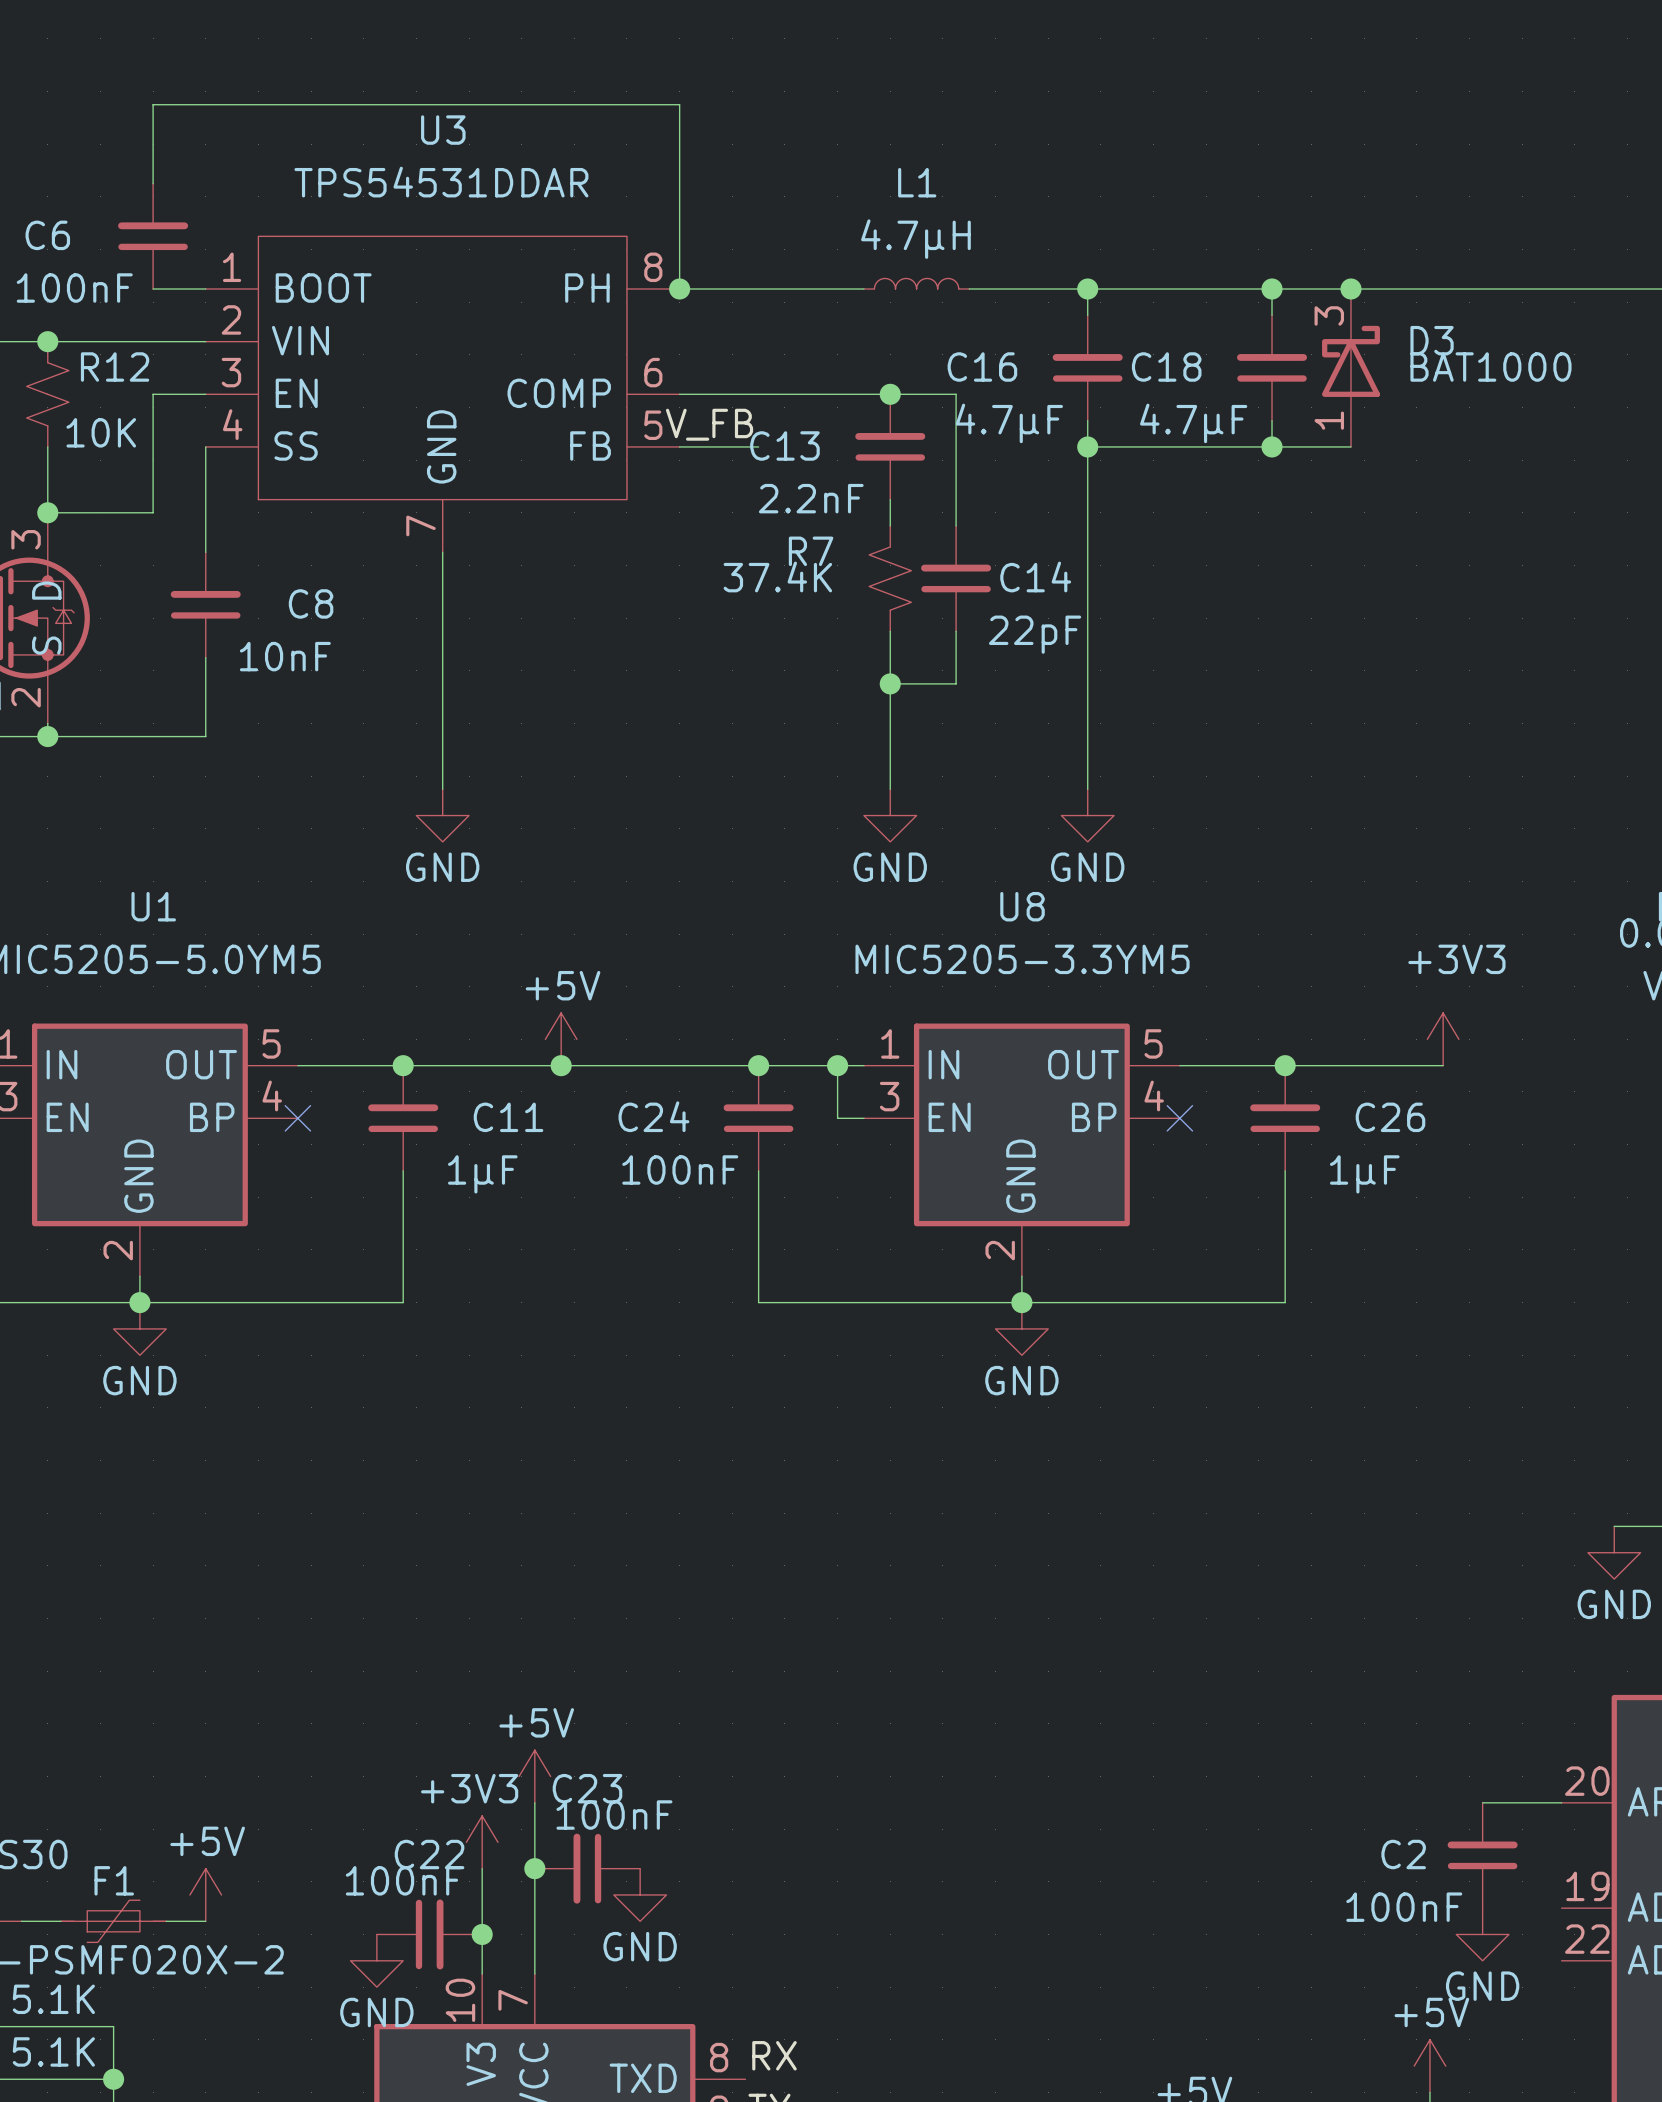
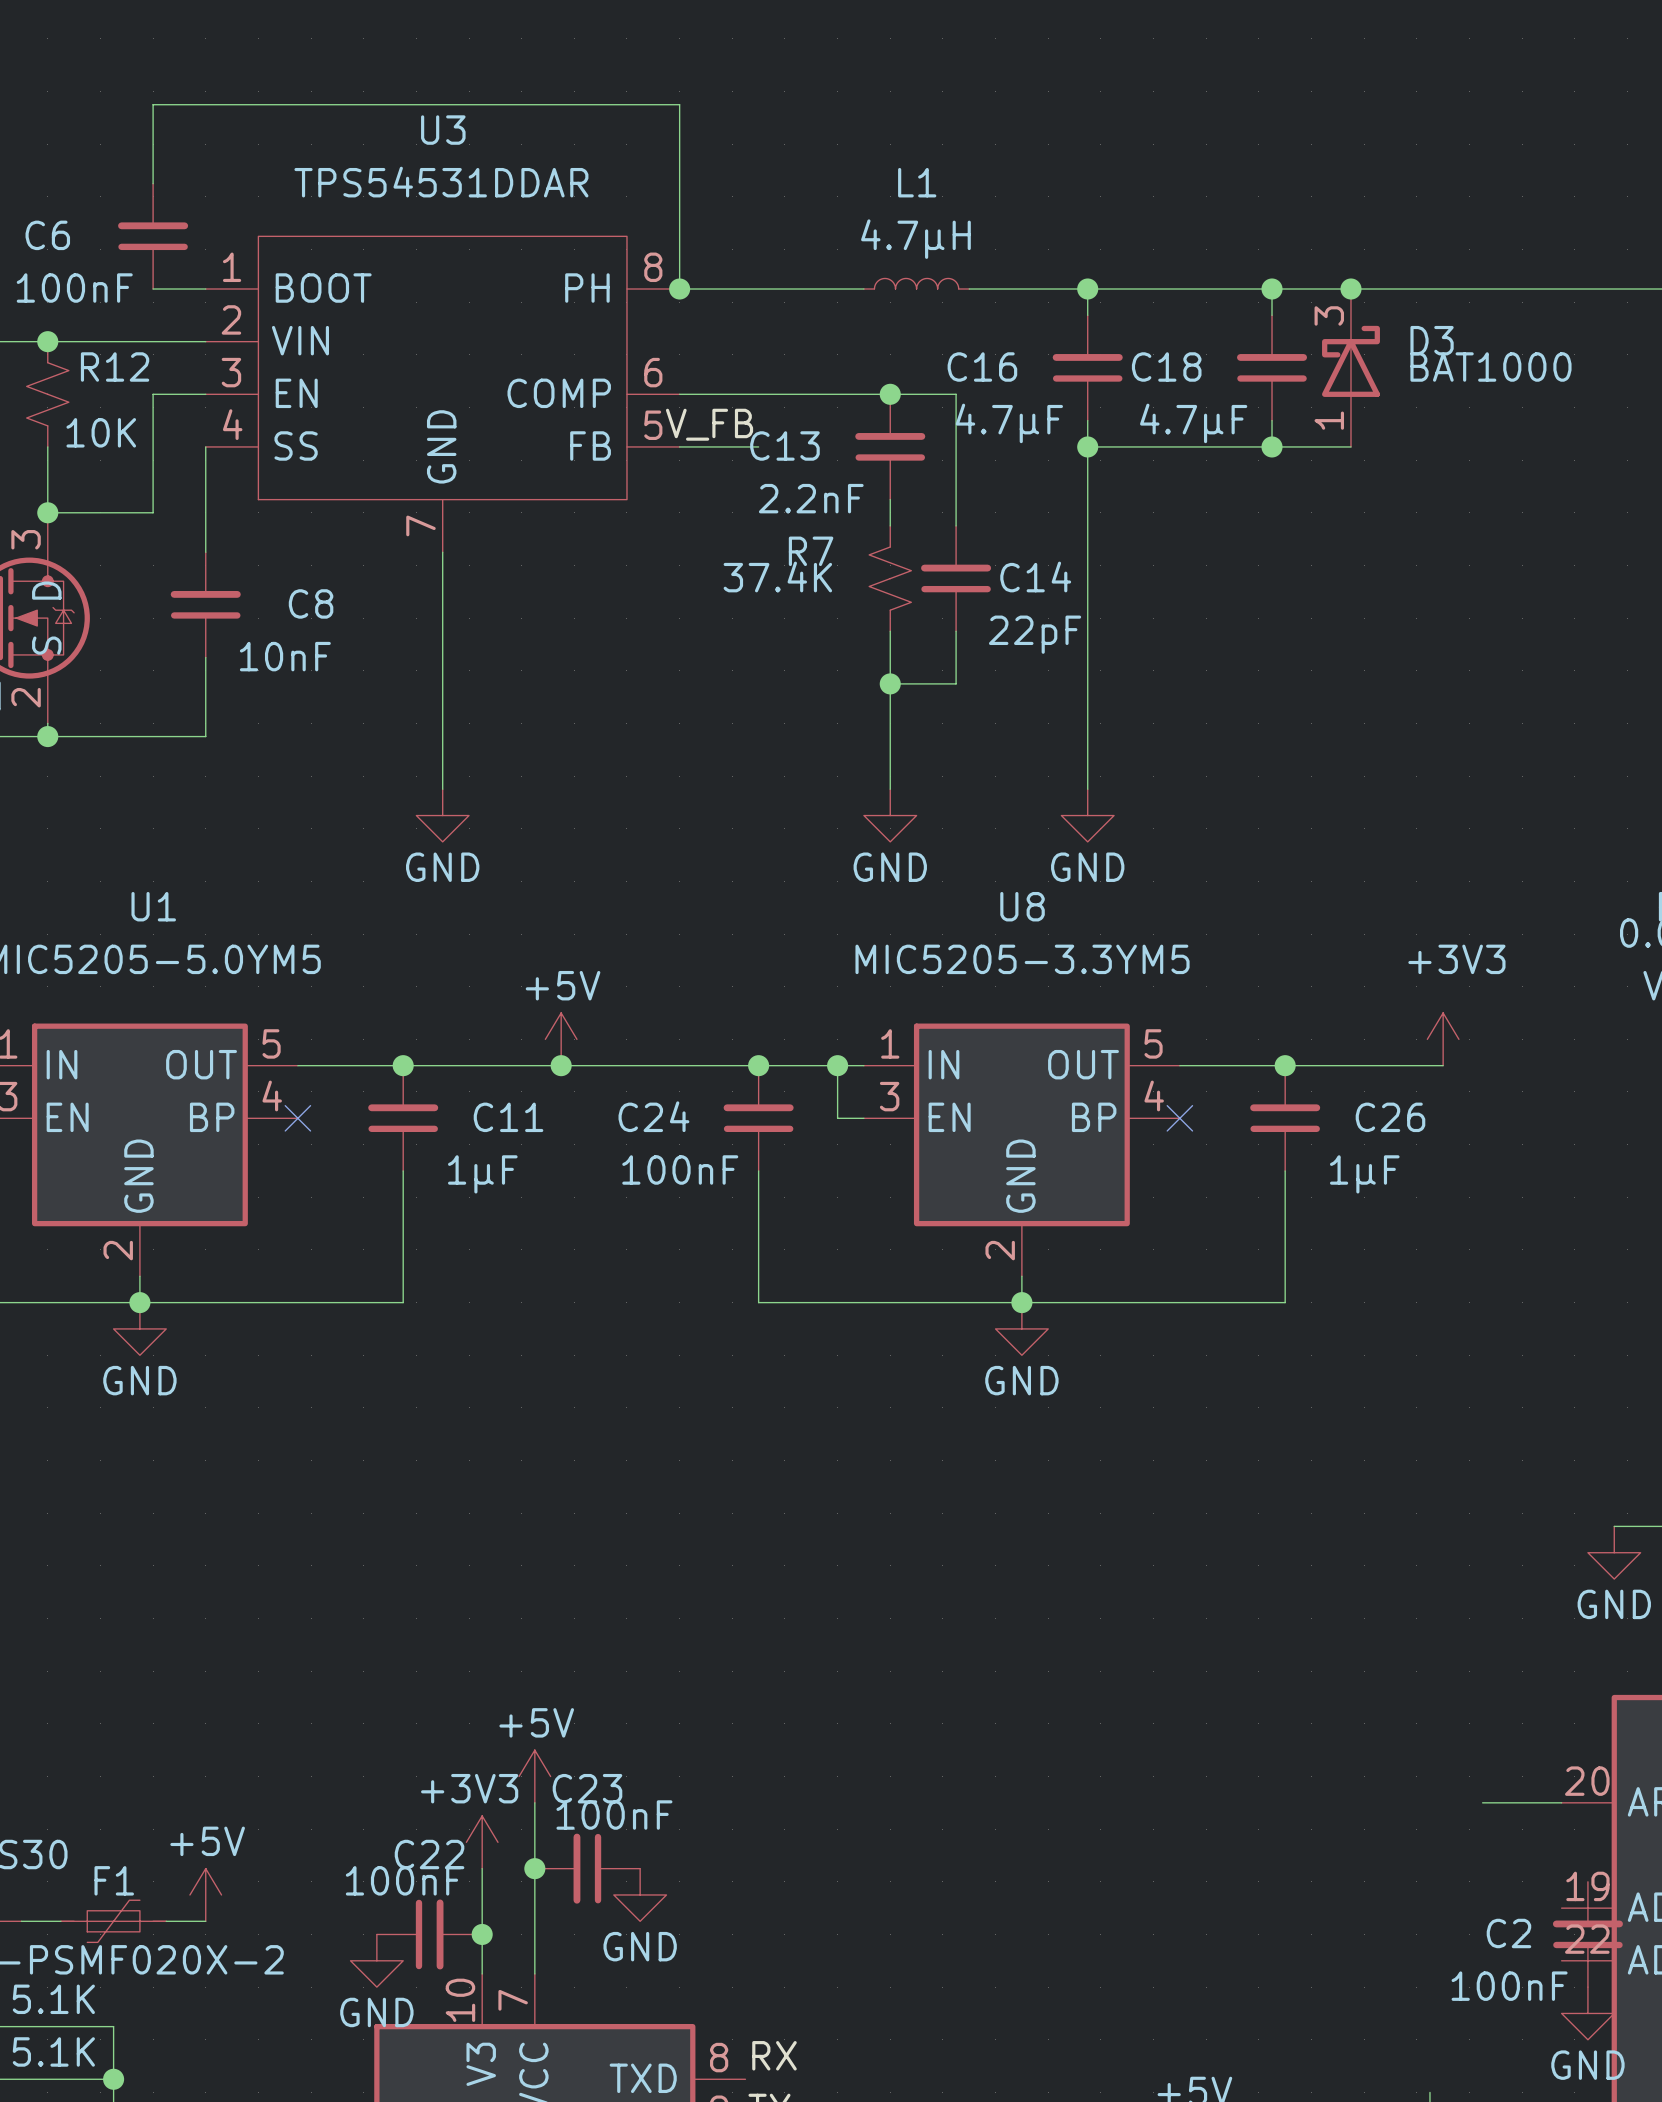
C2 position: (1482, 1855) -> (1587, 1934)
power symbol position: GND (1482, 1934) -> GND (1587, 2013)
power symbol: +5V (1429, 2066) -> none

